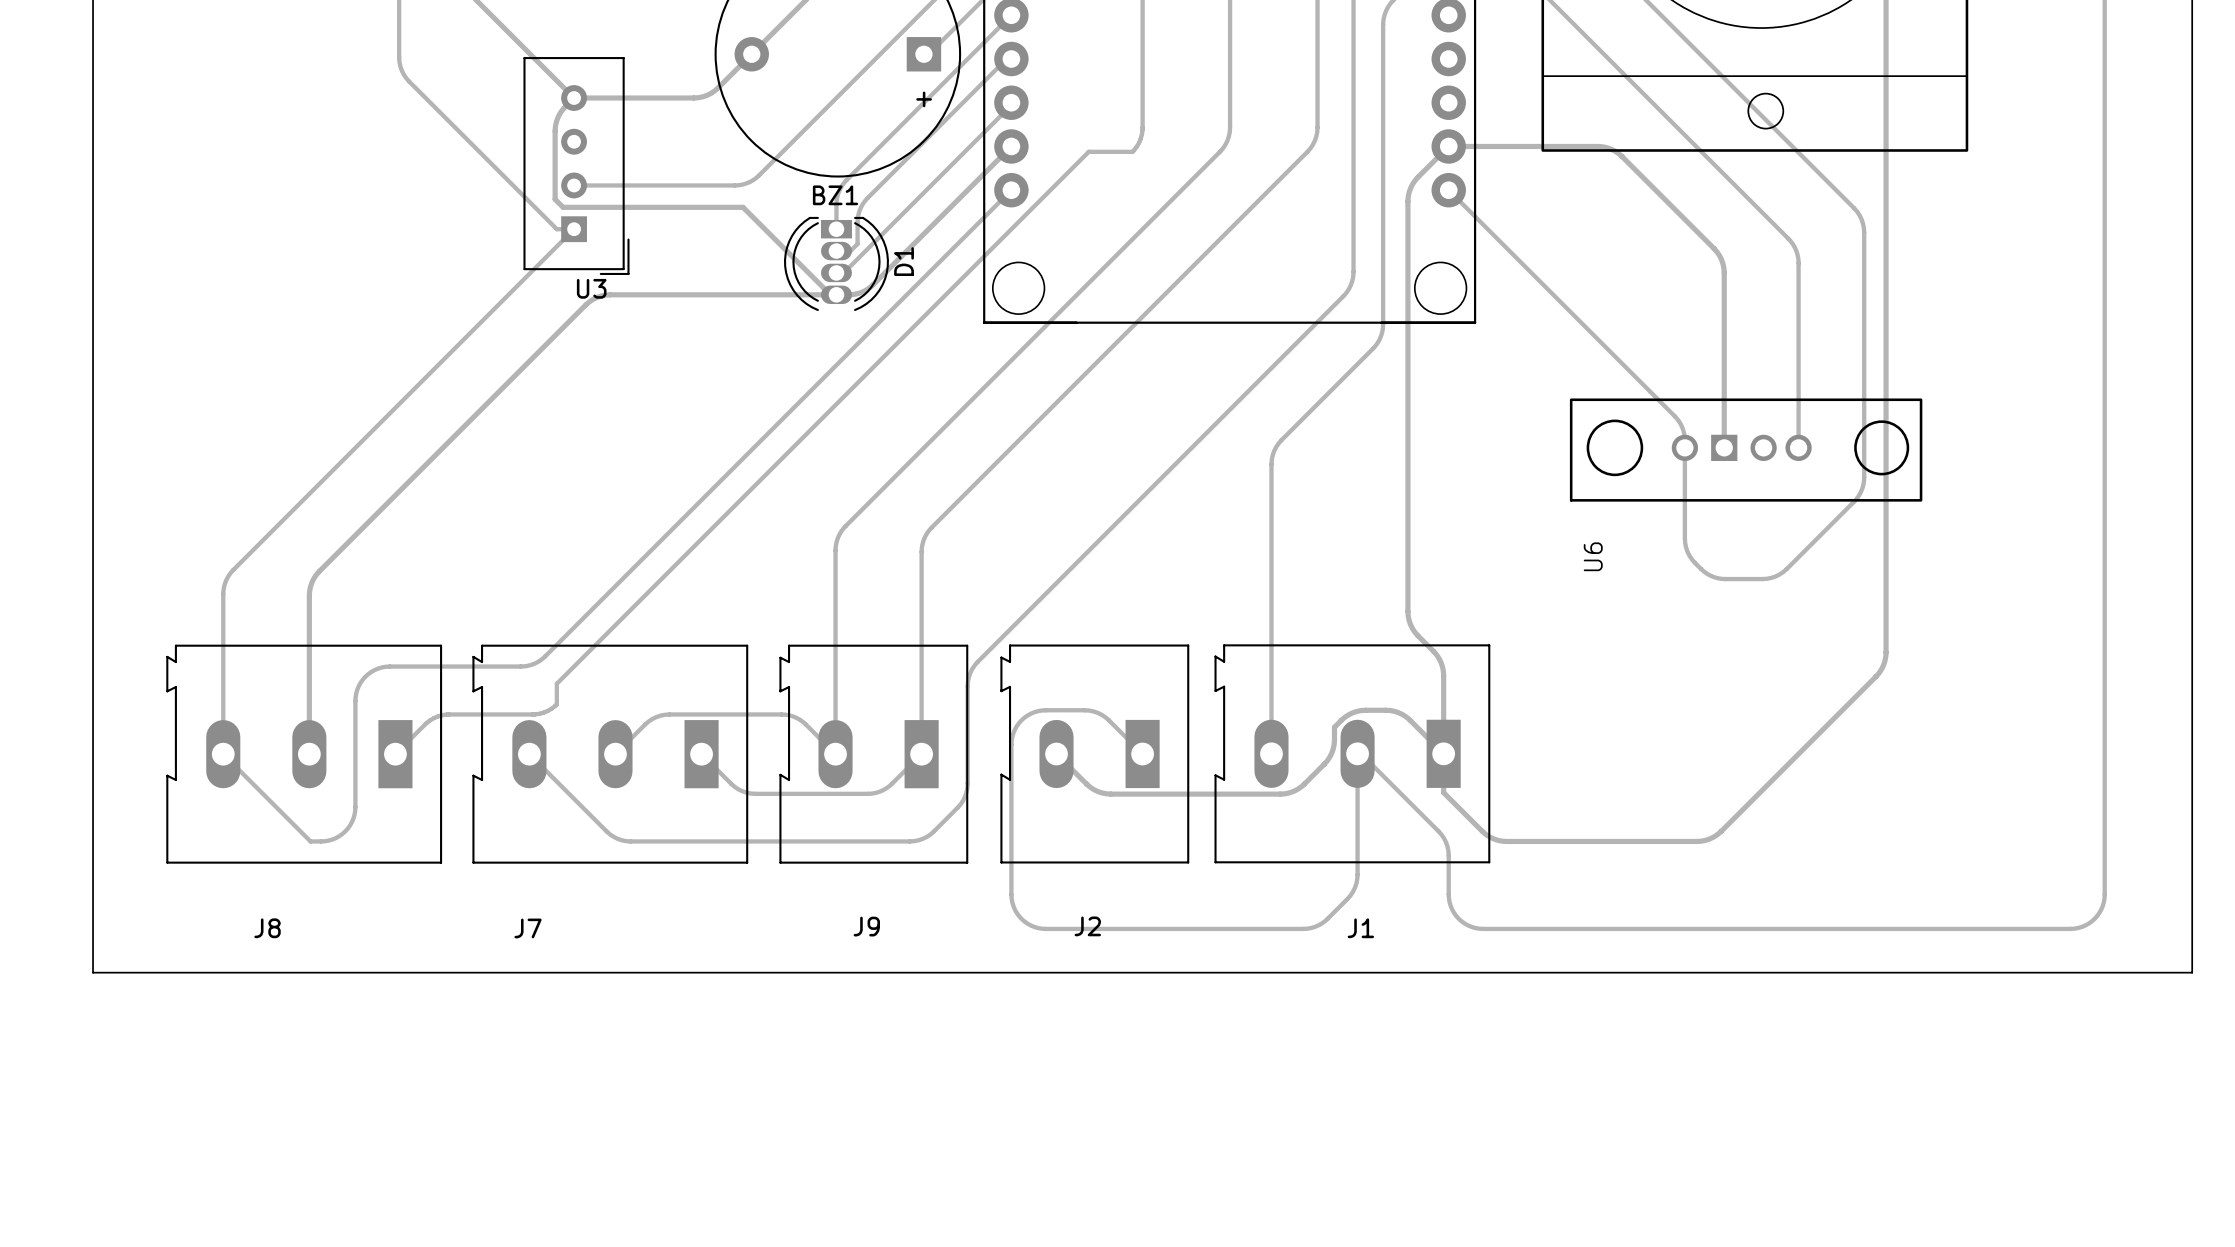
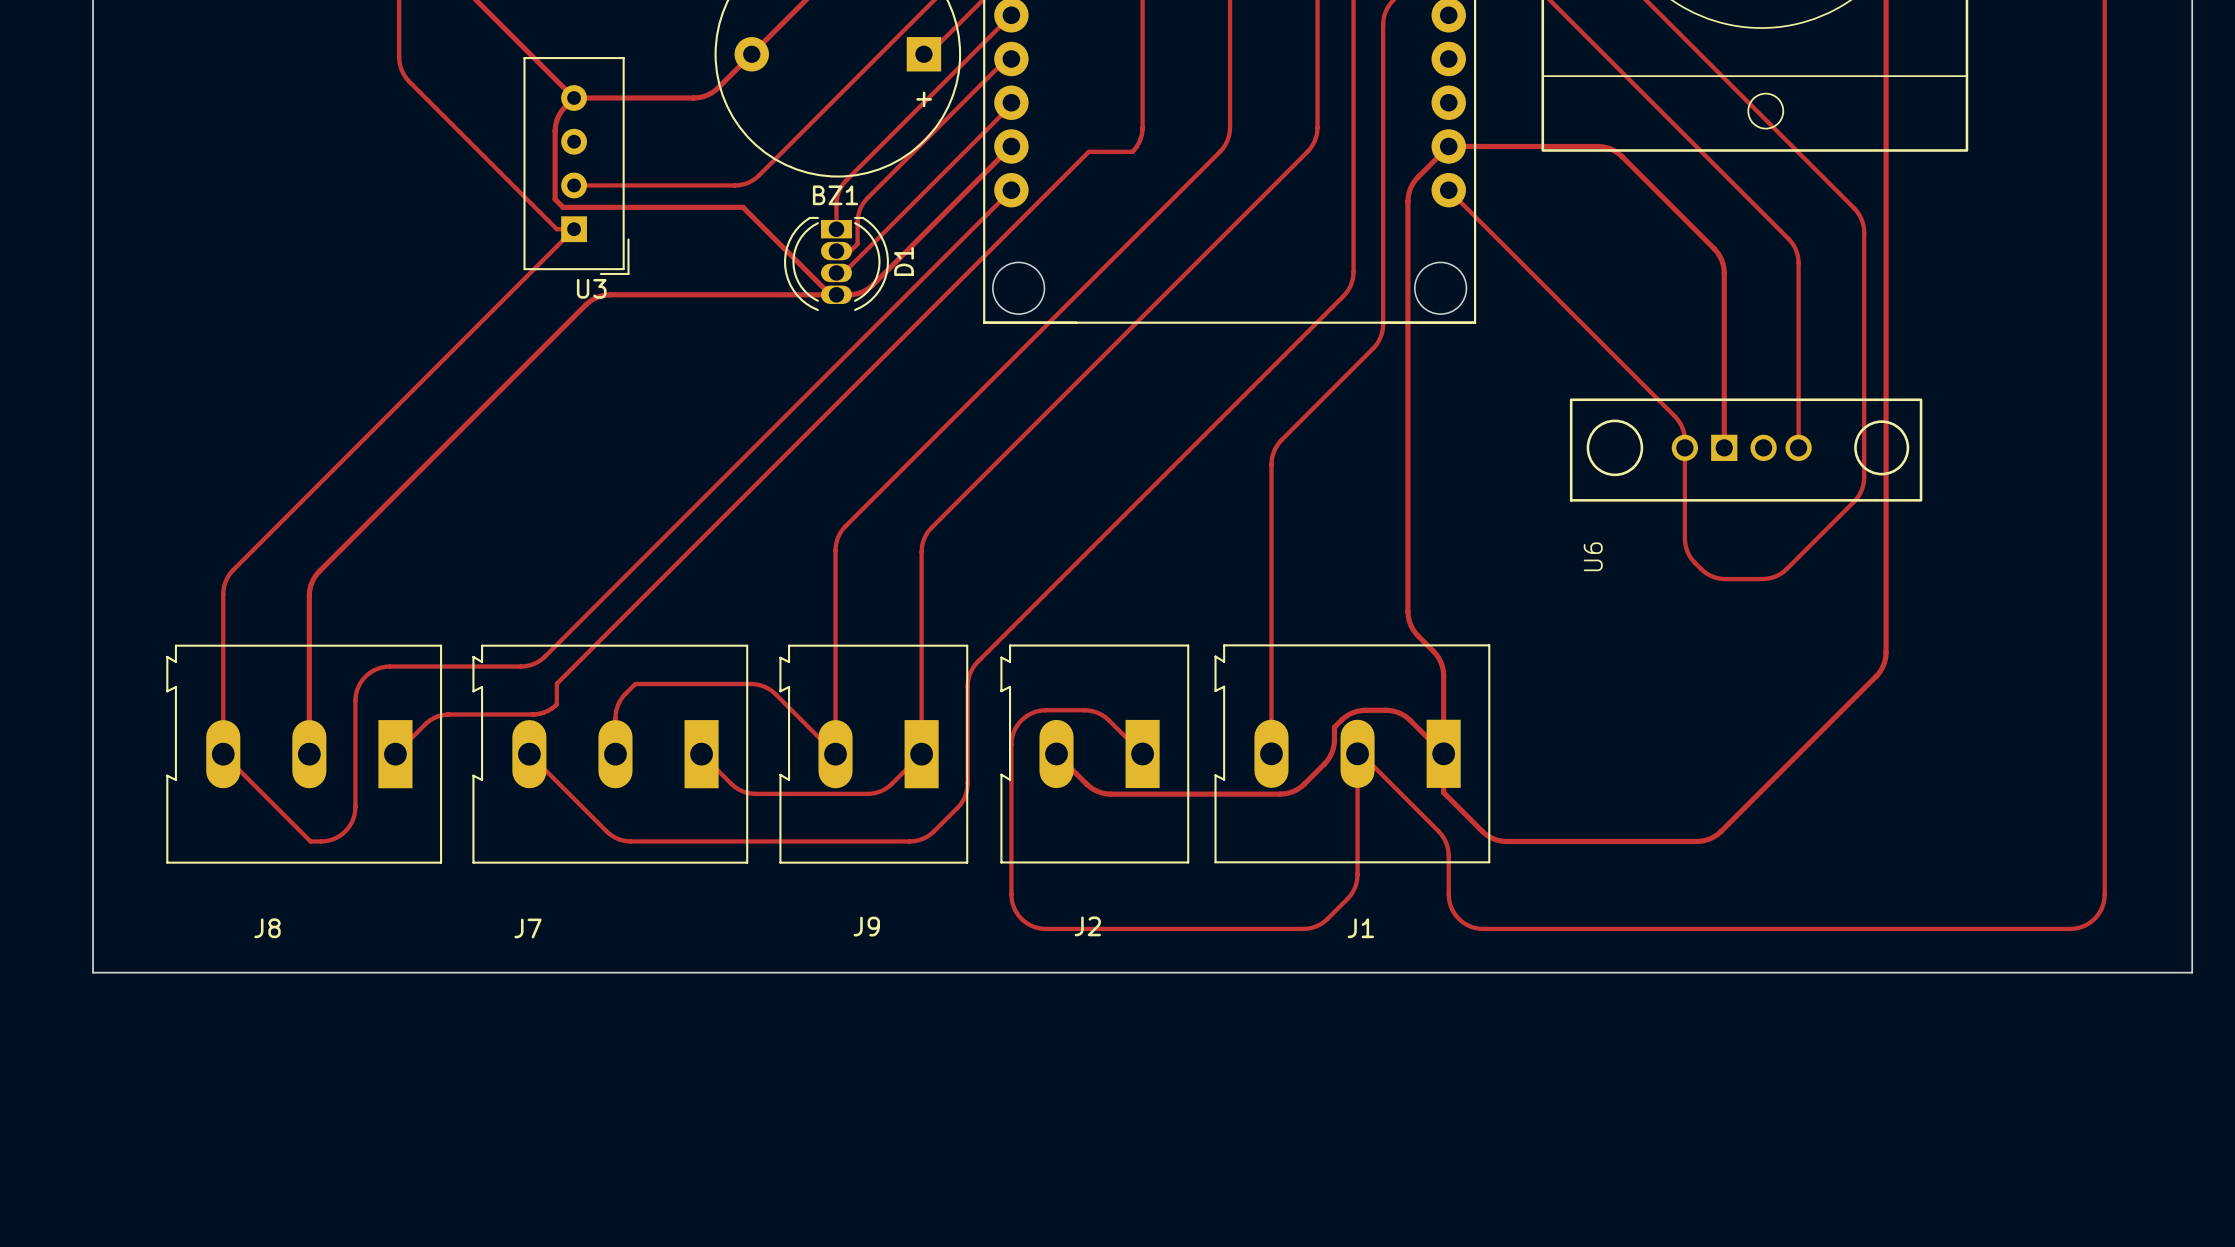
track: (805, 724) (794, 717) (784, 714) (664, 714) (648, 721) (615, 754) -> (805, 724) (772, 691) (757, 684) (635, 684) (623, 696) (616, 708) (615, 754)

